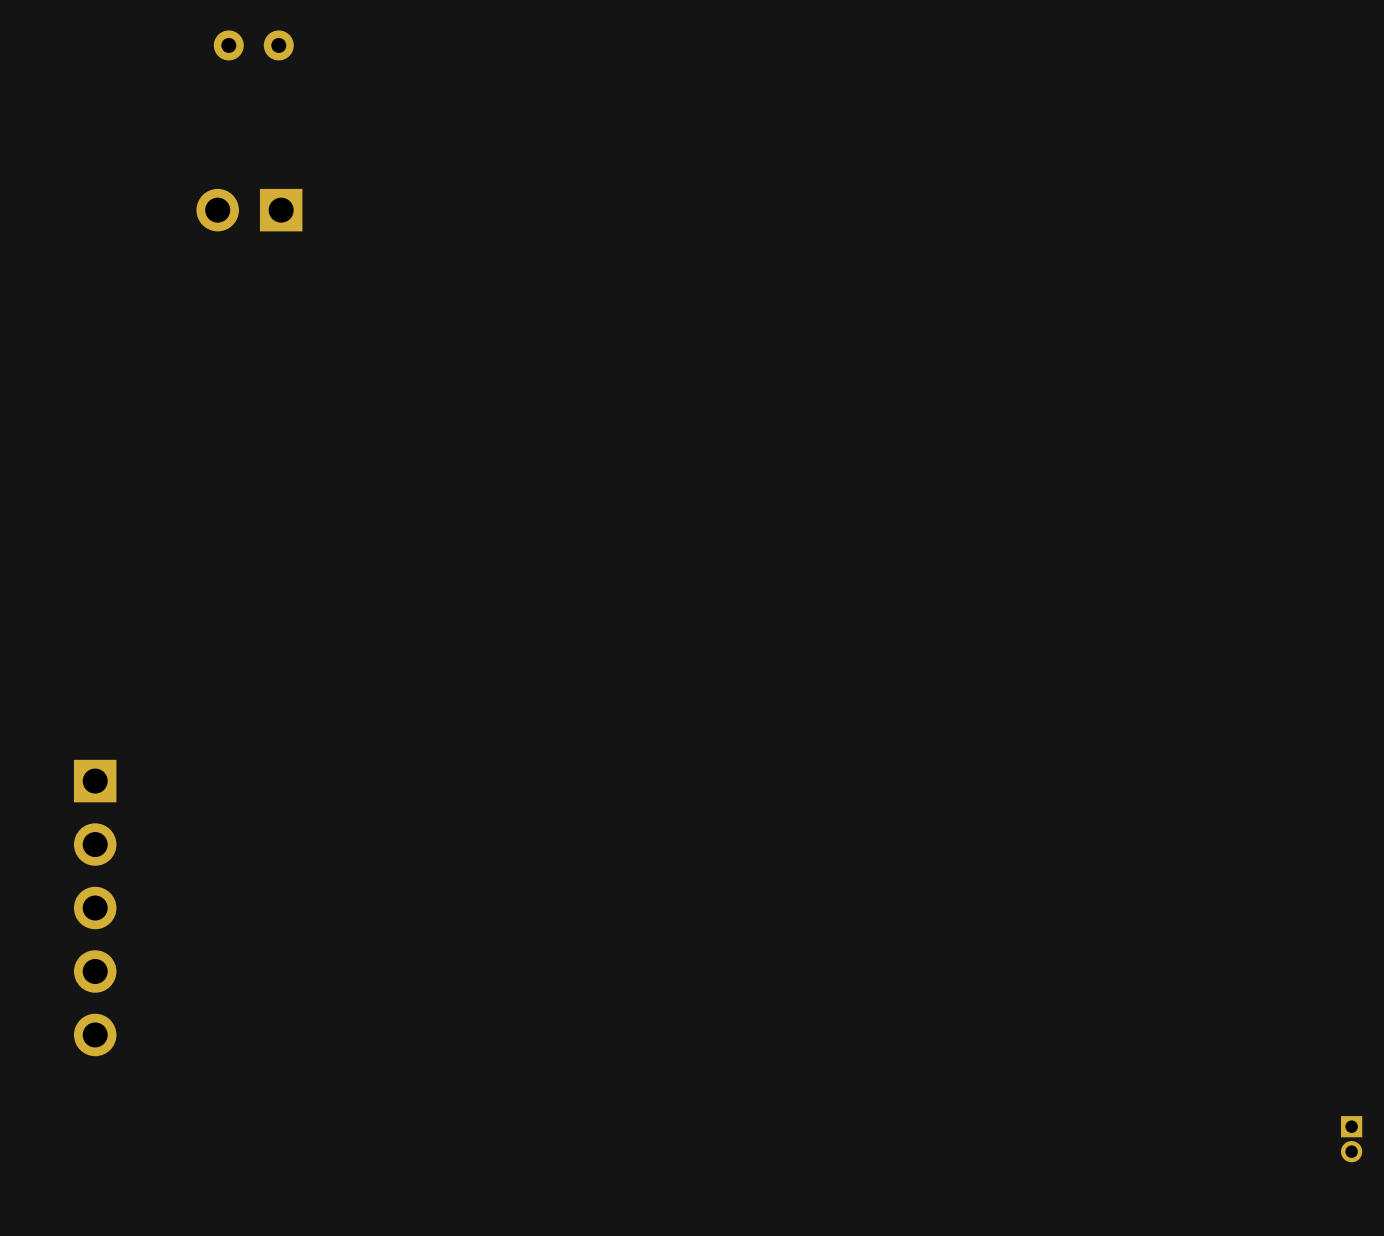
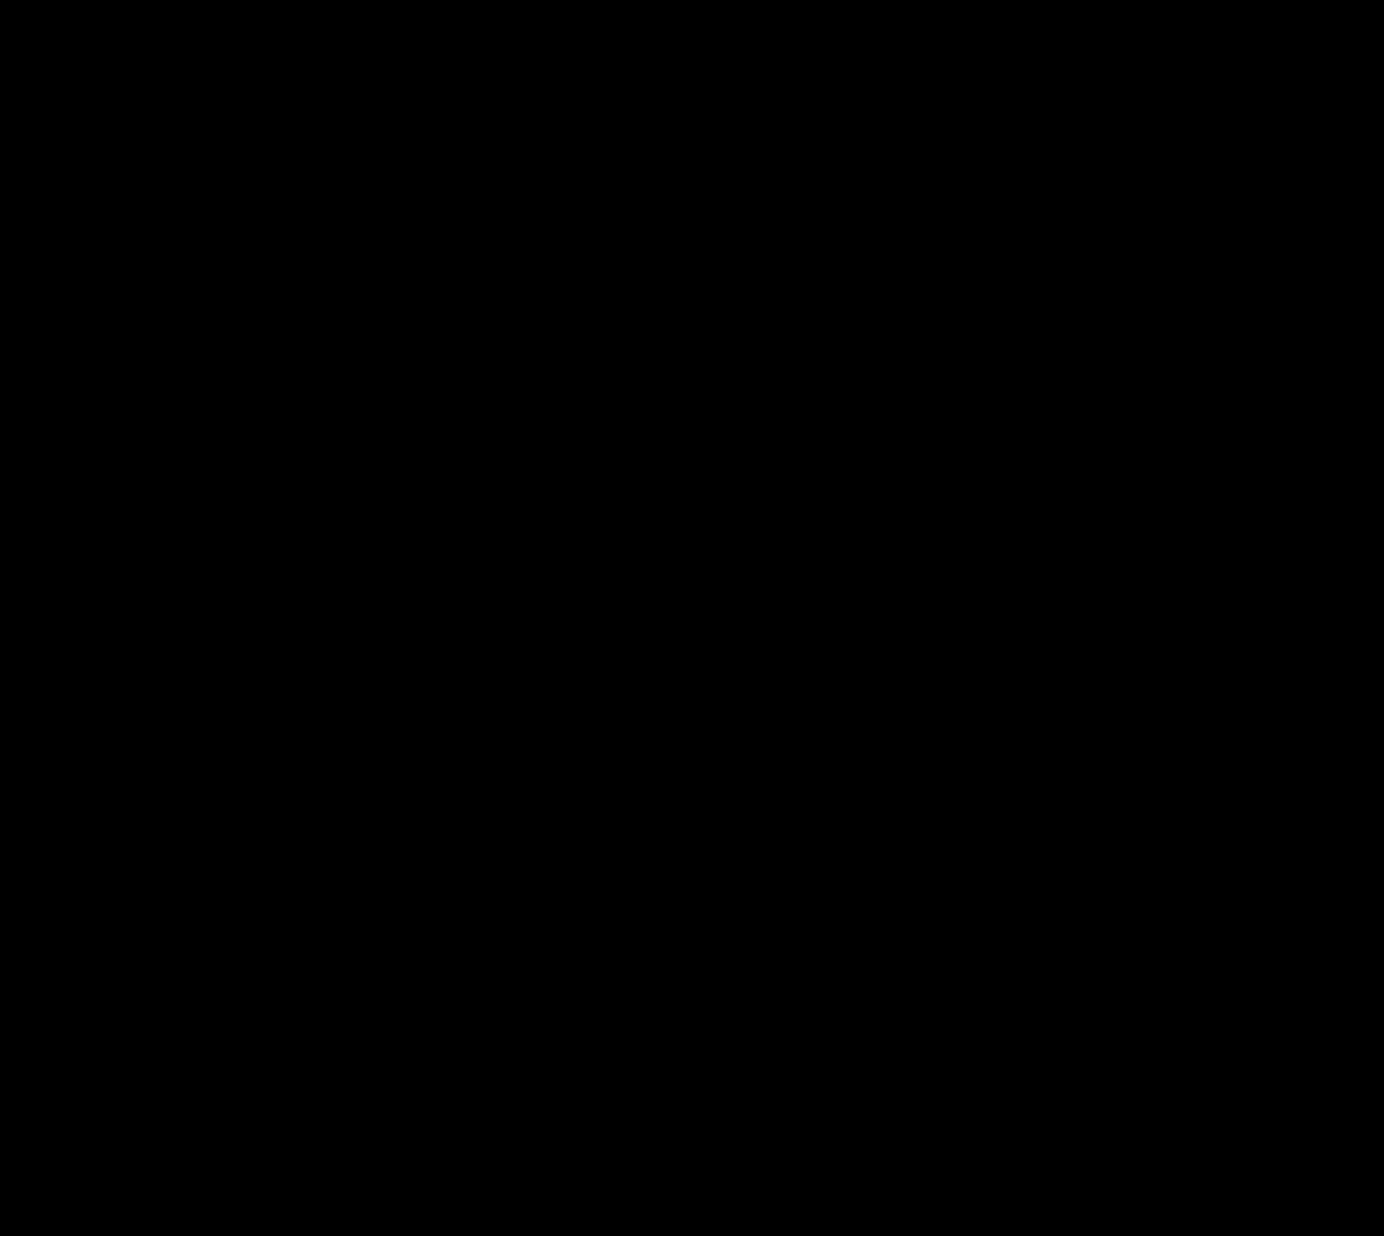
part: (253, 45) -> none
part: (249, 210) -> none
part: (95, 908) -> none
part: (1351, 1139) -> none

